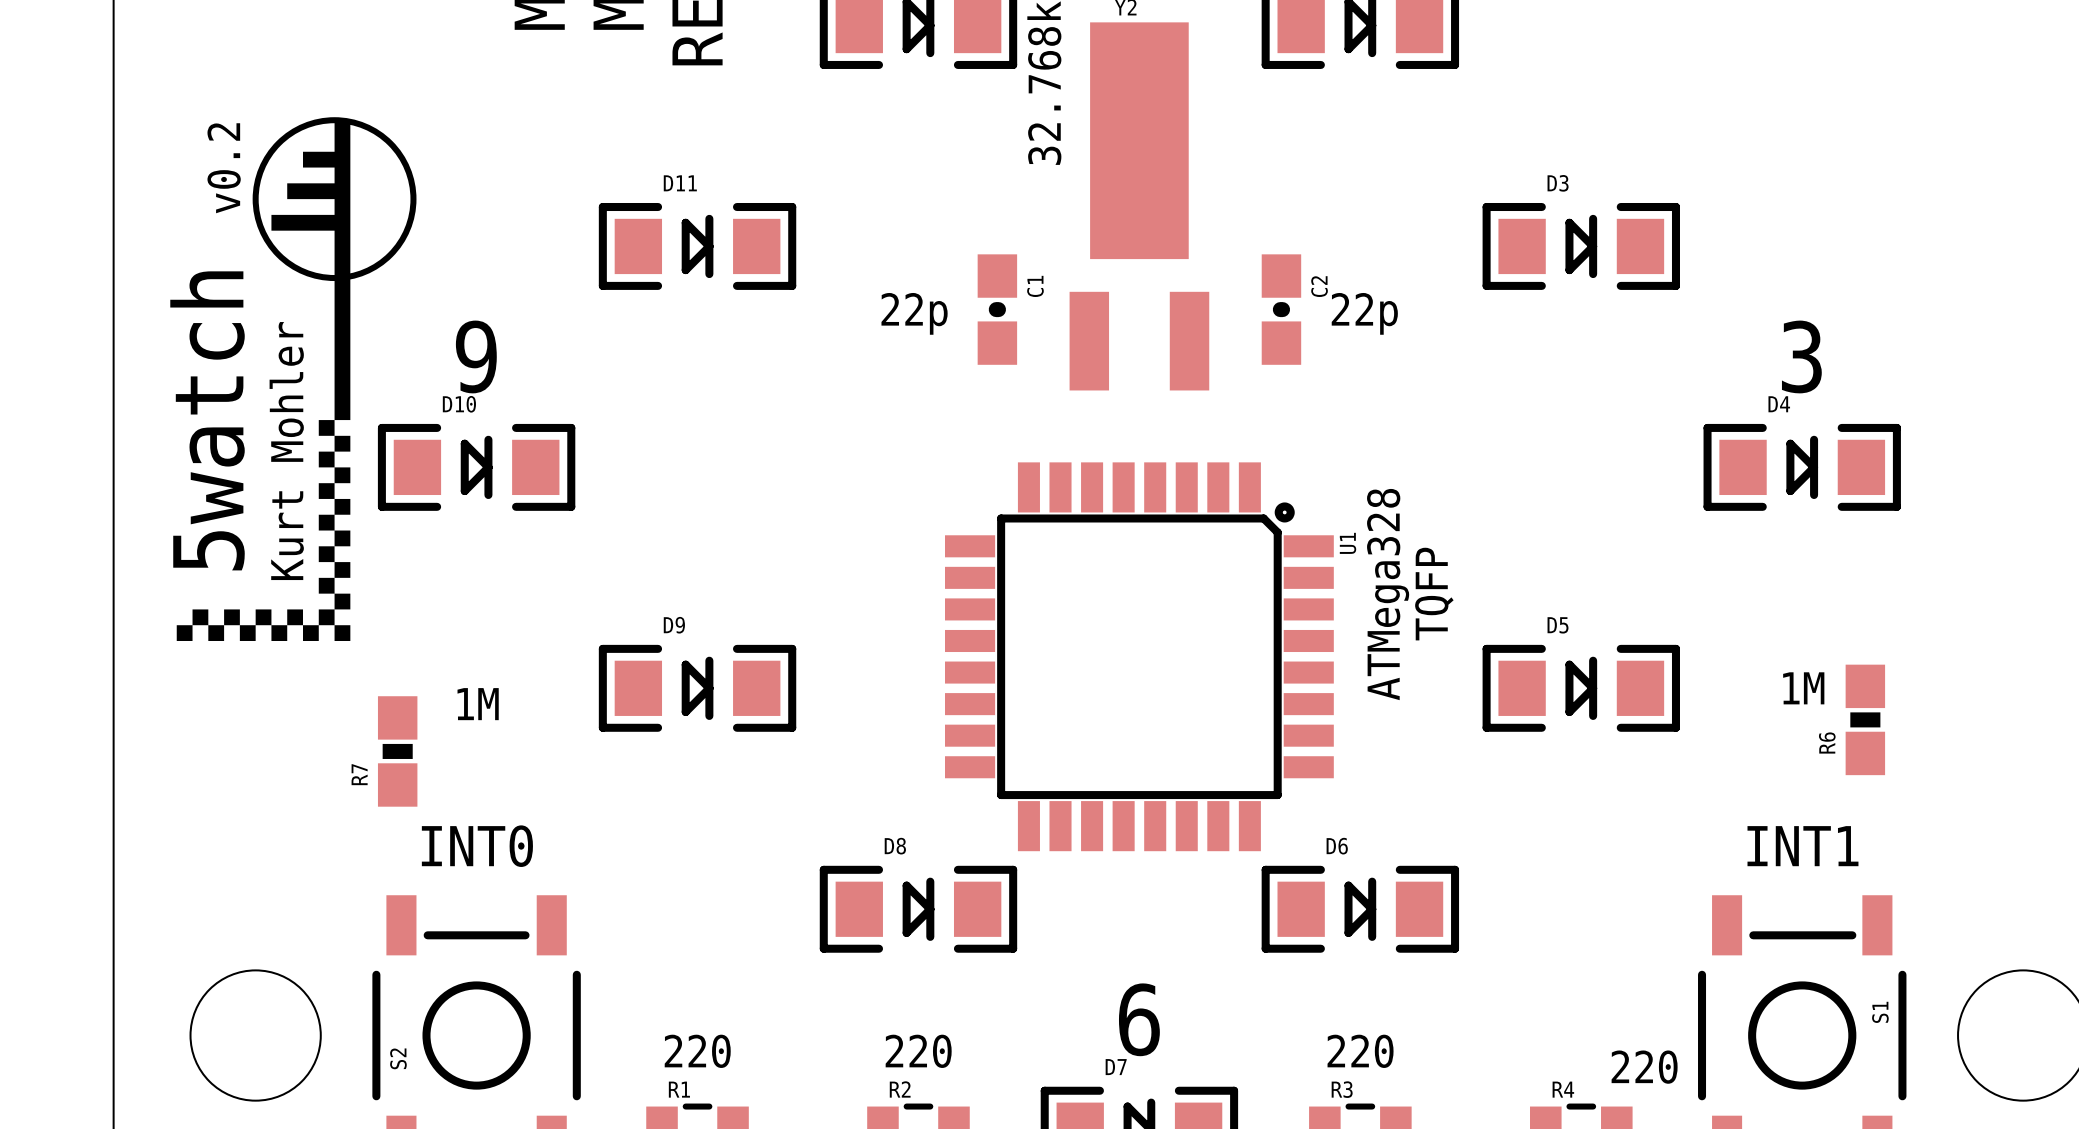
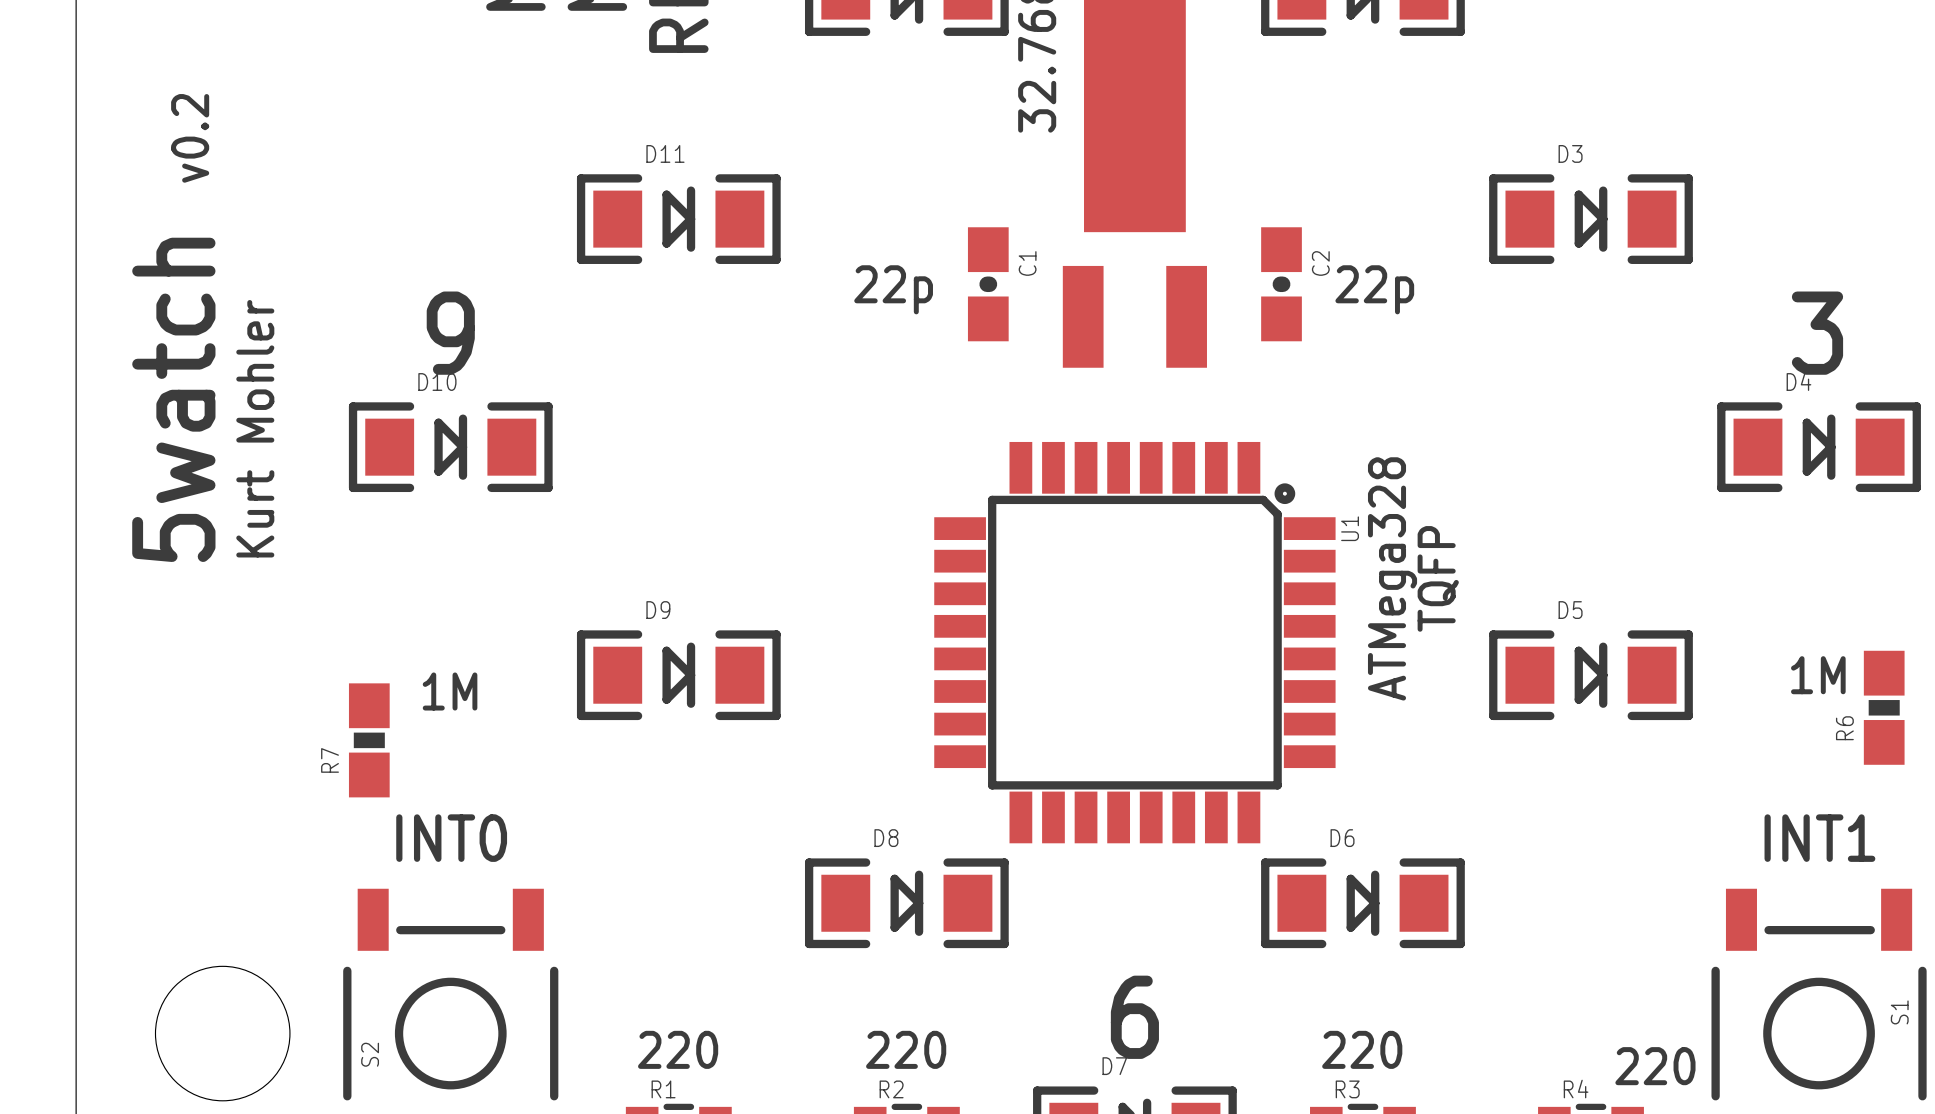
drawing: [176, 117, 417, 641] -> none

